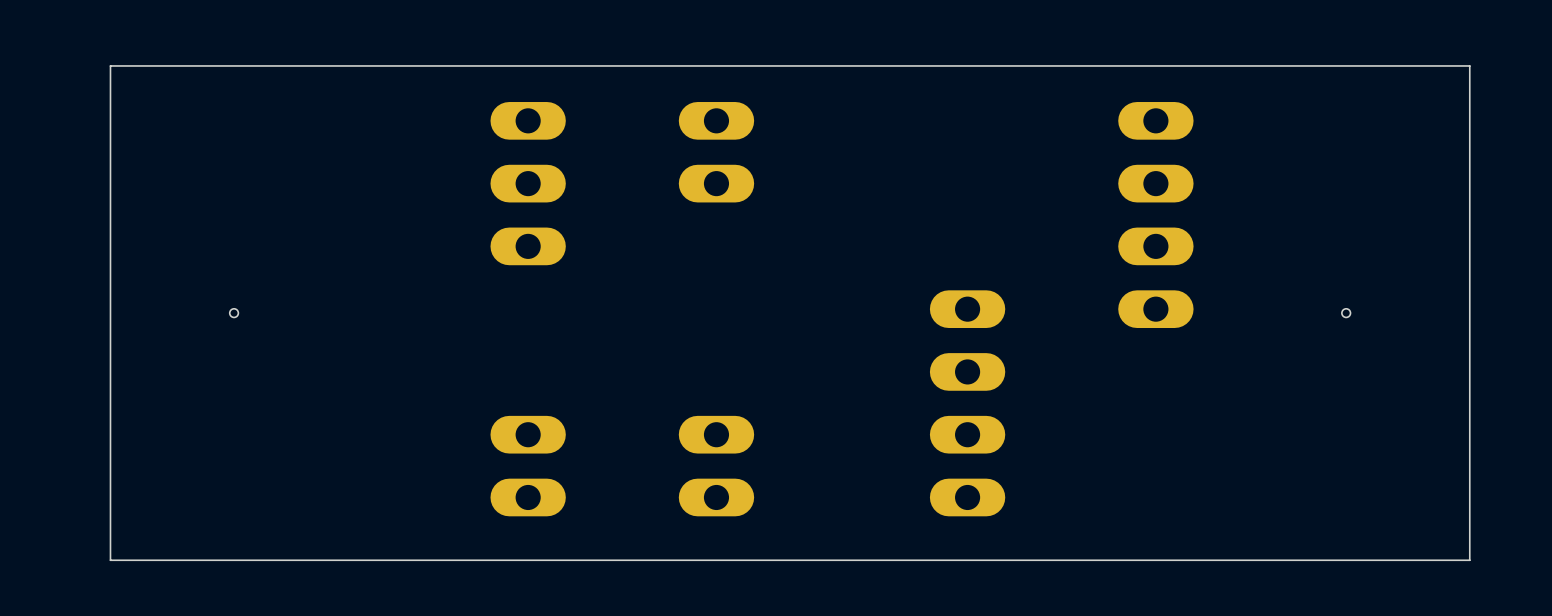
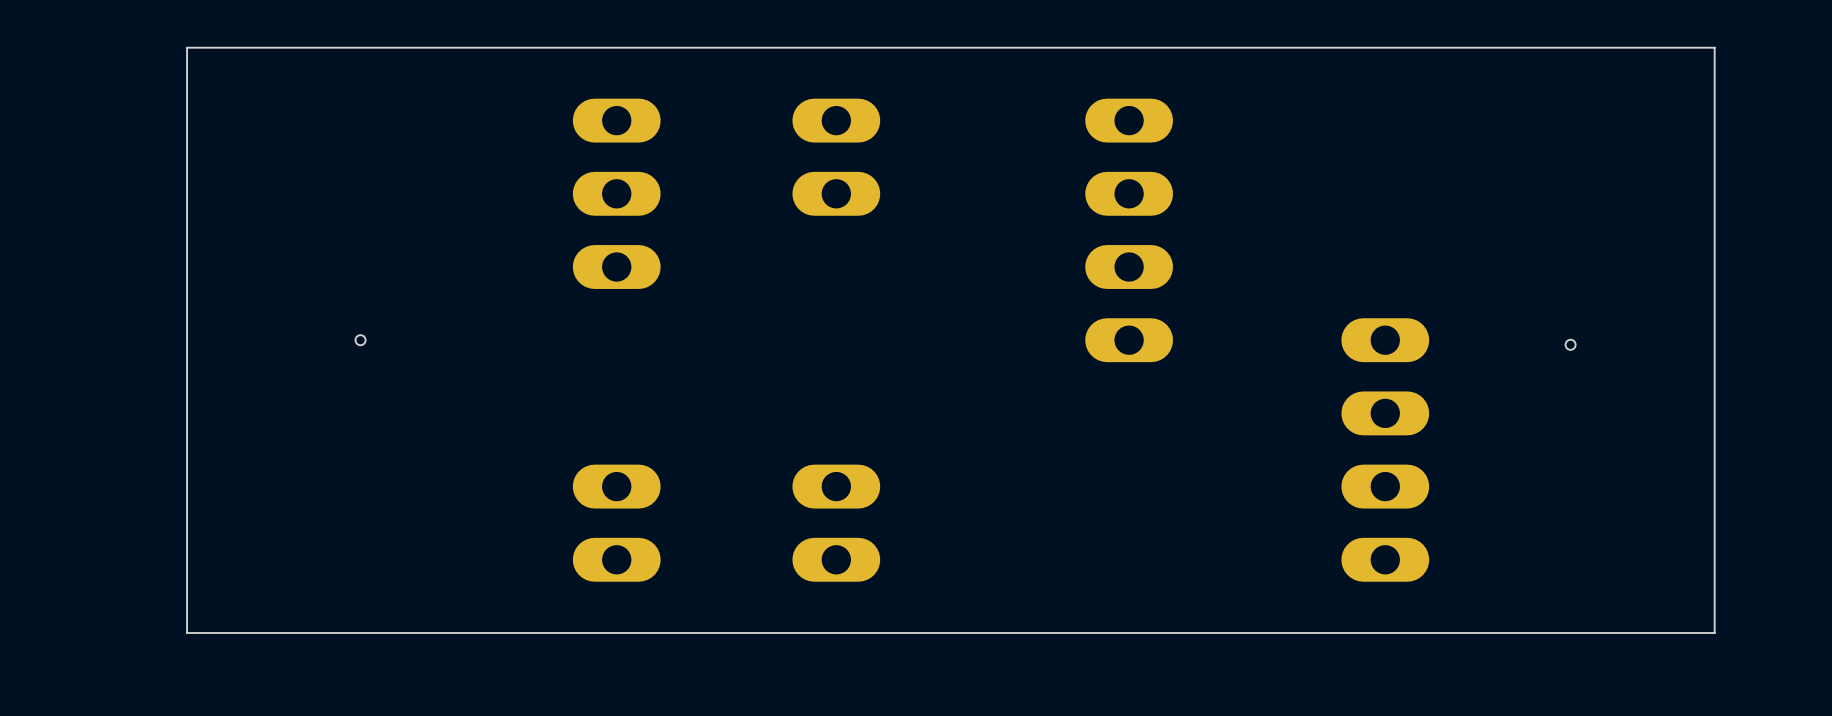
board edge: (1469, 65) (110, 65) (110, 560) (159, 560) -> (1714, 56) (1714, 47) (187, 47) (187, 632)
part: none -> (1129, 230)
part: (1155, 215) -> none
hole position: (234, 313) -> (360, 340)
part: (967, 403) -> none
part: none -> (1385, 449)

